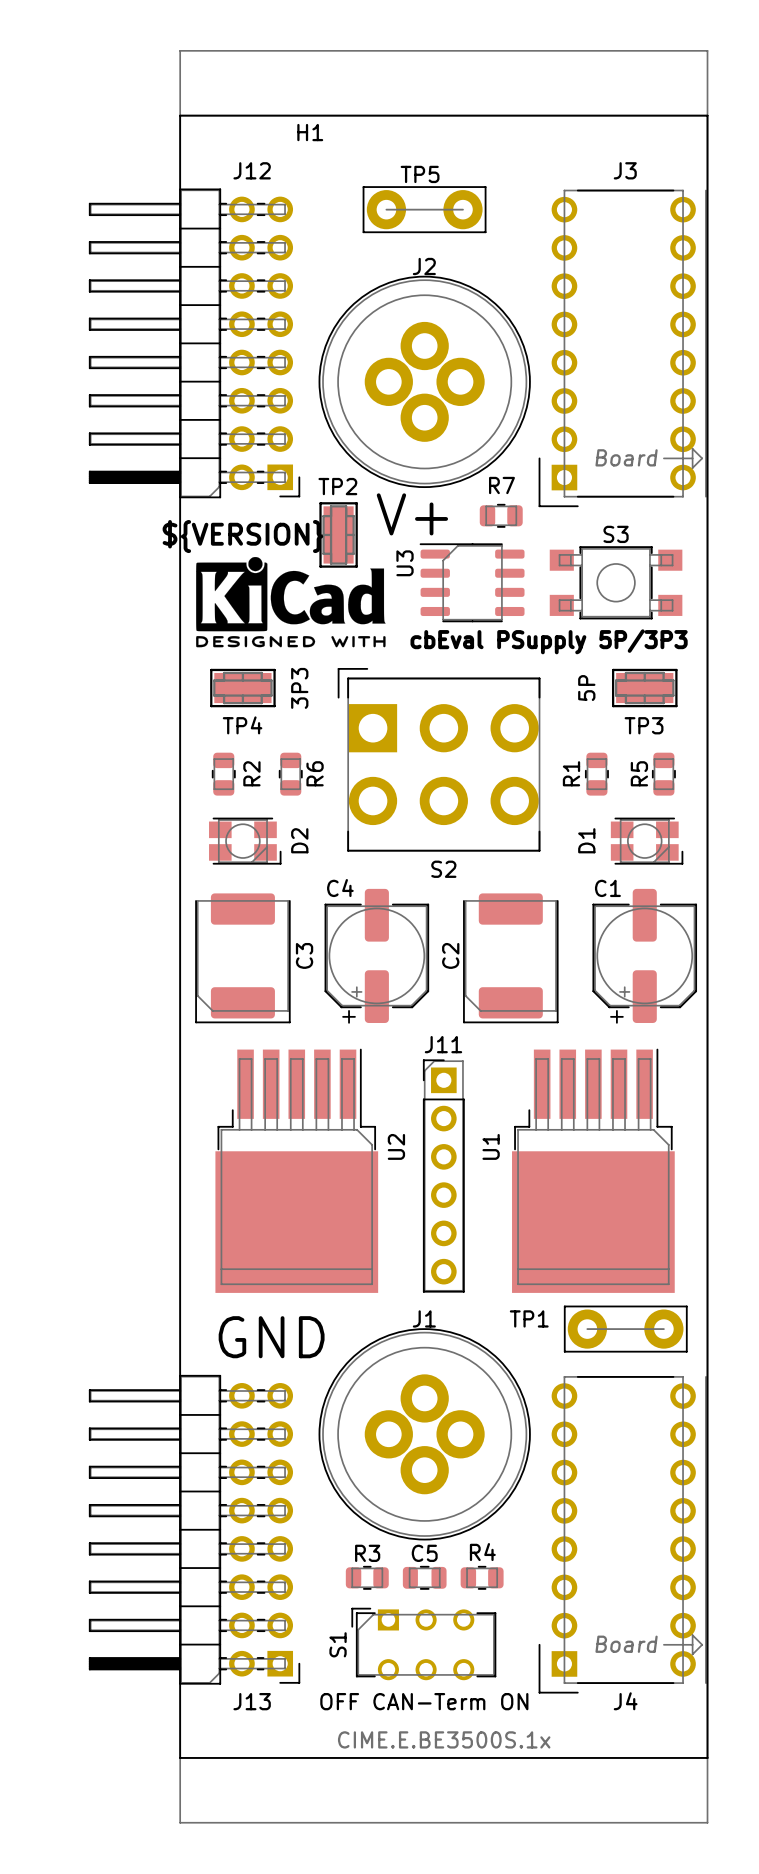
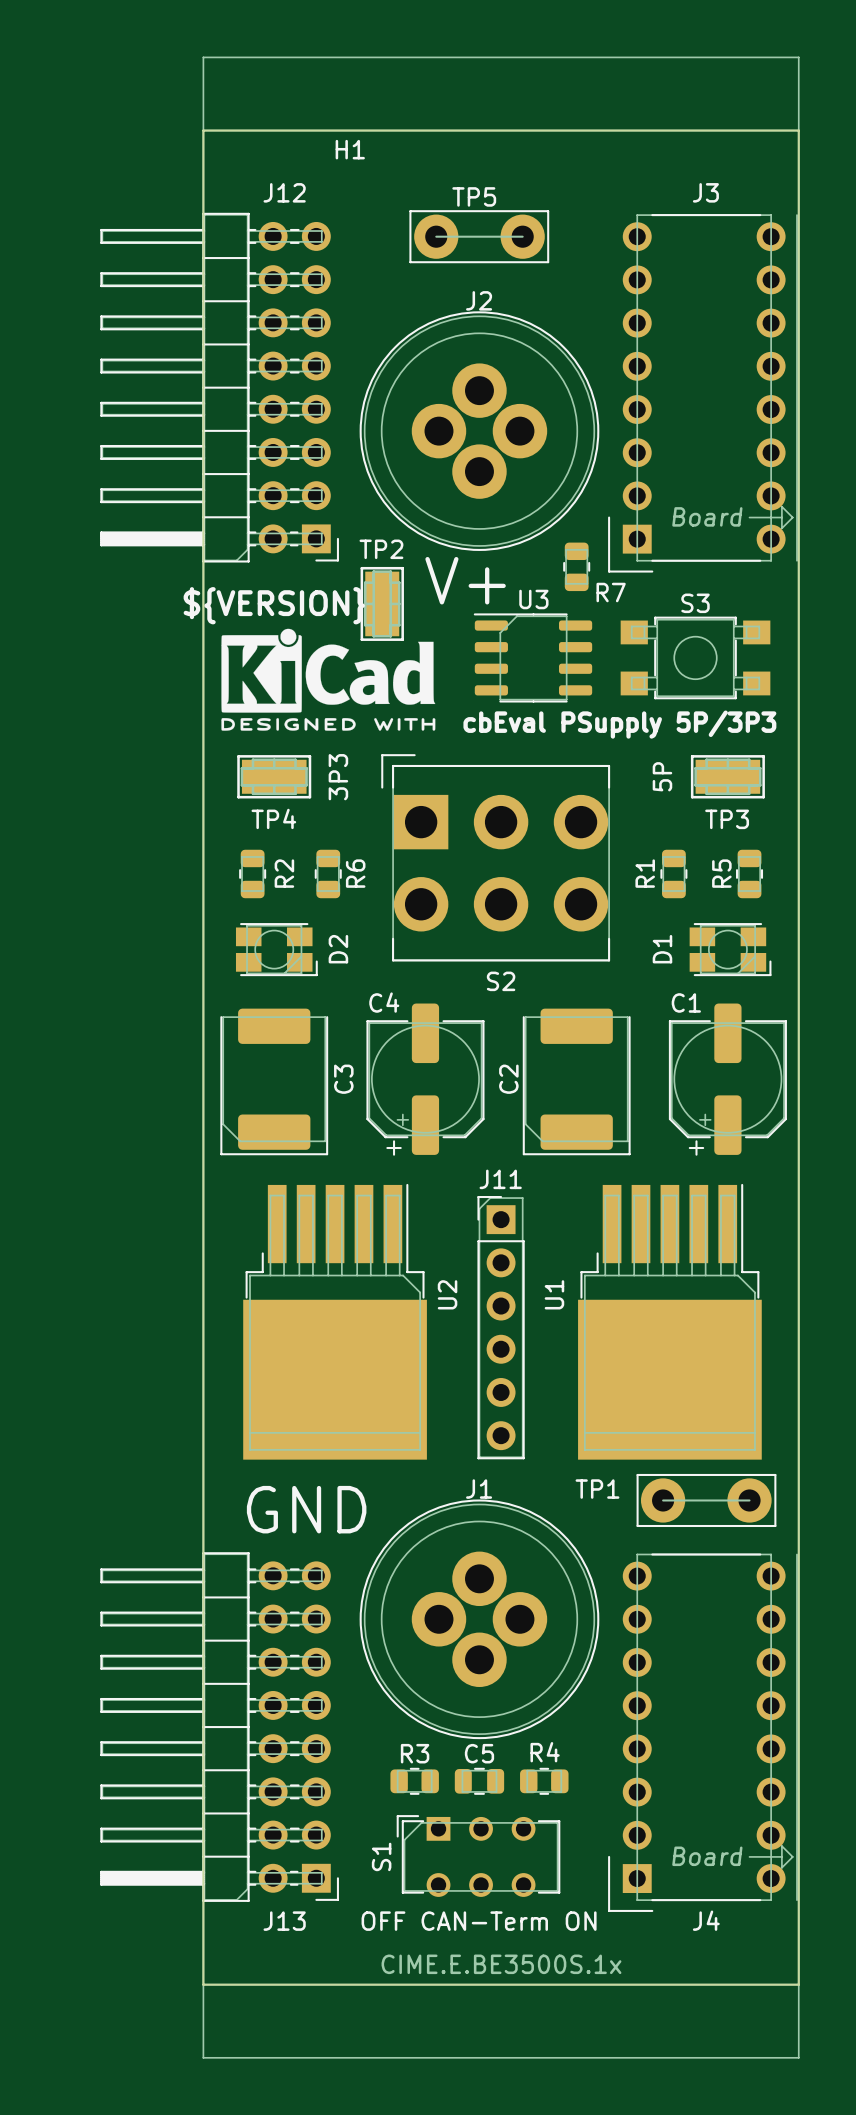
R7 rotation: 0° (501, 515) -> 90° clockwise (576, 566)
U3 name rotation: 0° (405, 563) -> 90° clockwise (533, 599)
U3 name position: U3 (405, 563) -> U3 (533, 599)

